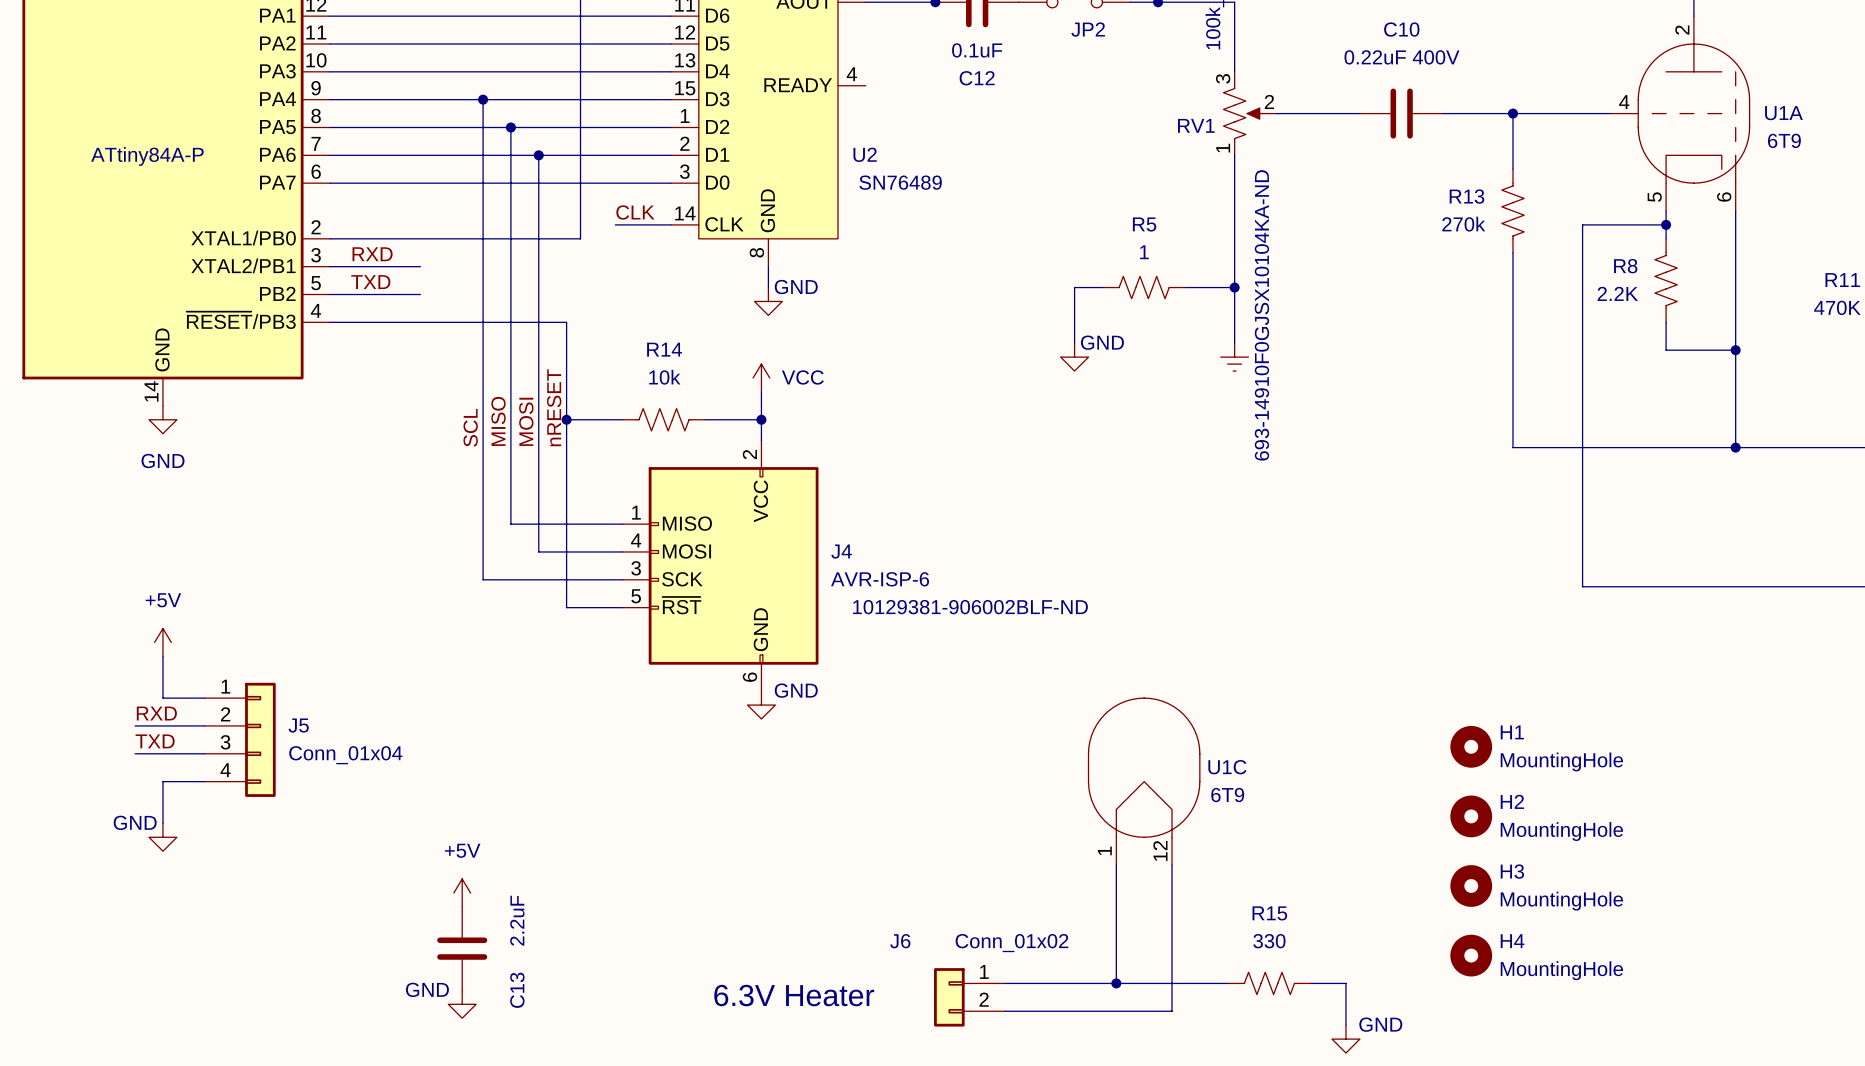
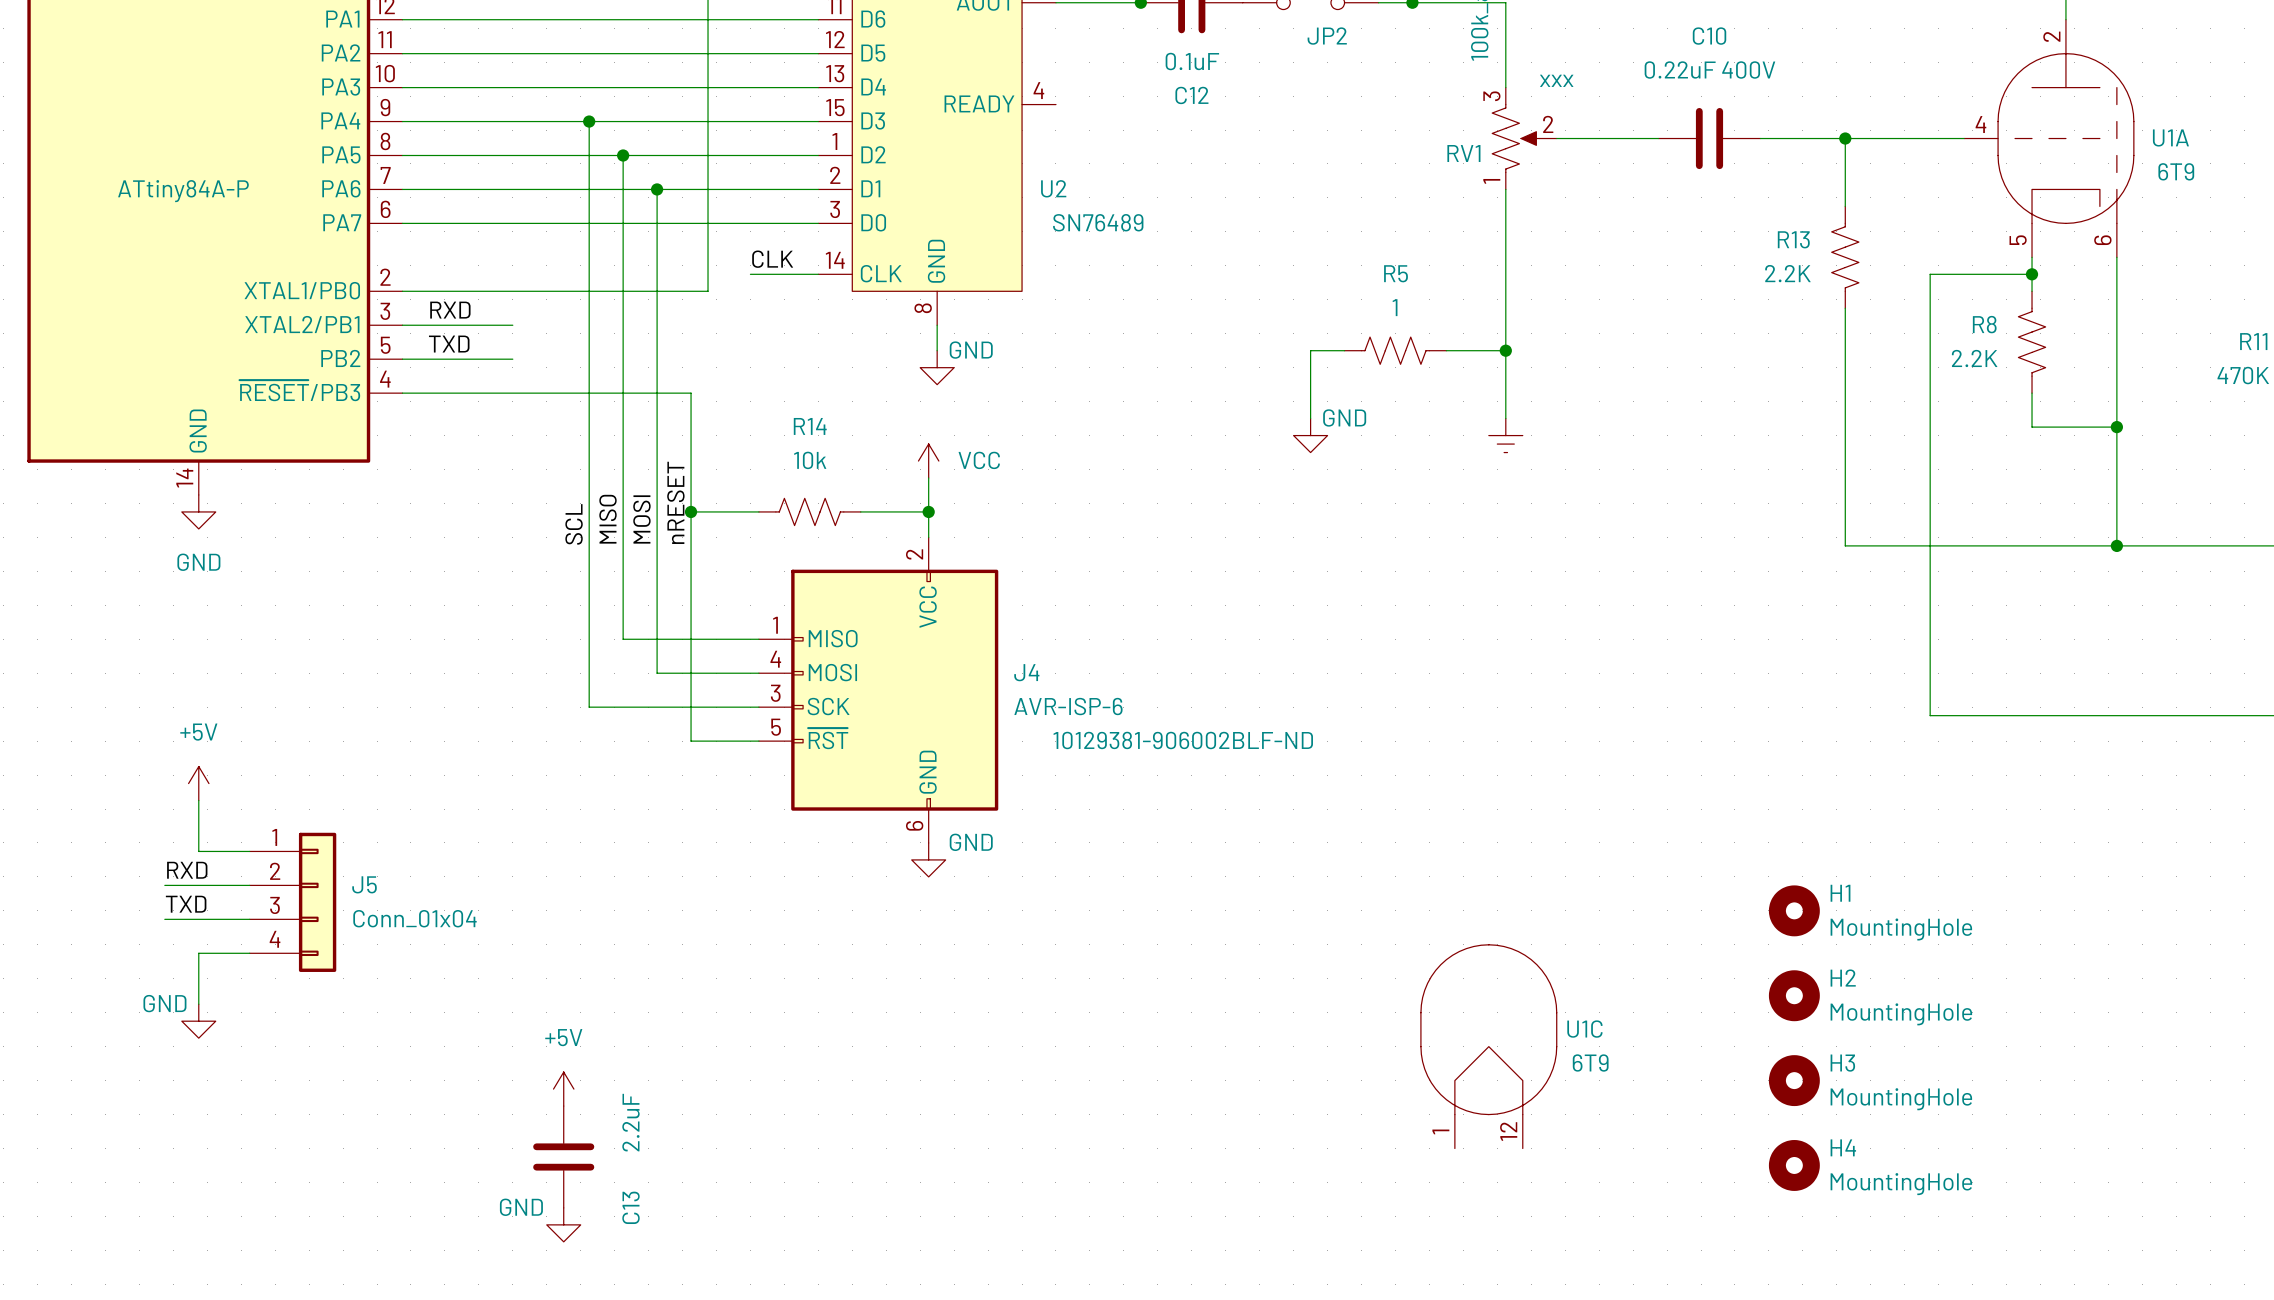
R13 value: 270k (1463, 224) -> 2.2K (1787, 273)
RV1 text: 693-14910F0GJSX10104KA-ND (1261, 315) -> xxx (1556, 80)
U1C position: (1144, 781) -> (1488, 1046)
wire: (1116, 865) (1116, 983) -> none
wire: (1172, 865) (1172, 1011) (1005, 1011) -> none
wire: (1005, 983) (1227, 983) -> none
junction: (1116, 983) -> none
R15: 330 (1269, 983) -> none
wire: (1311, 983) (1345, 983) (1345, 1025) -> none
text: 6.3V Heater (794, 995) -> none
J6: Conn_01x02 (969, 997) -> none
power symbol: GND (1345, 1039) -> none

